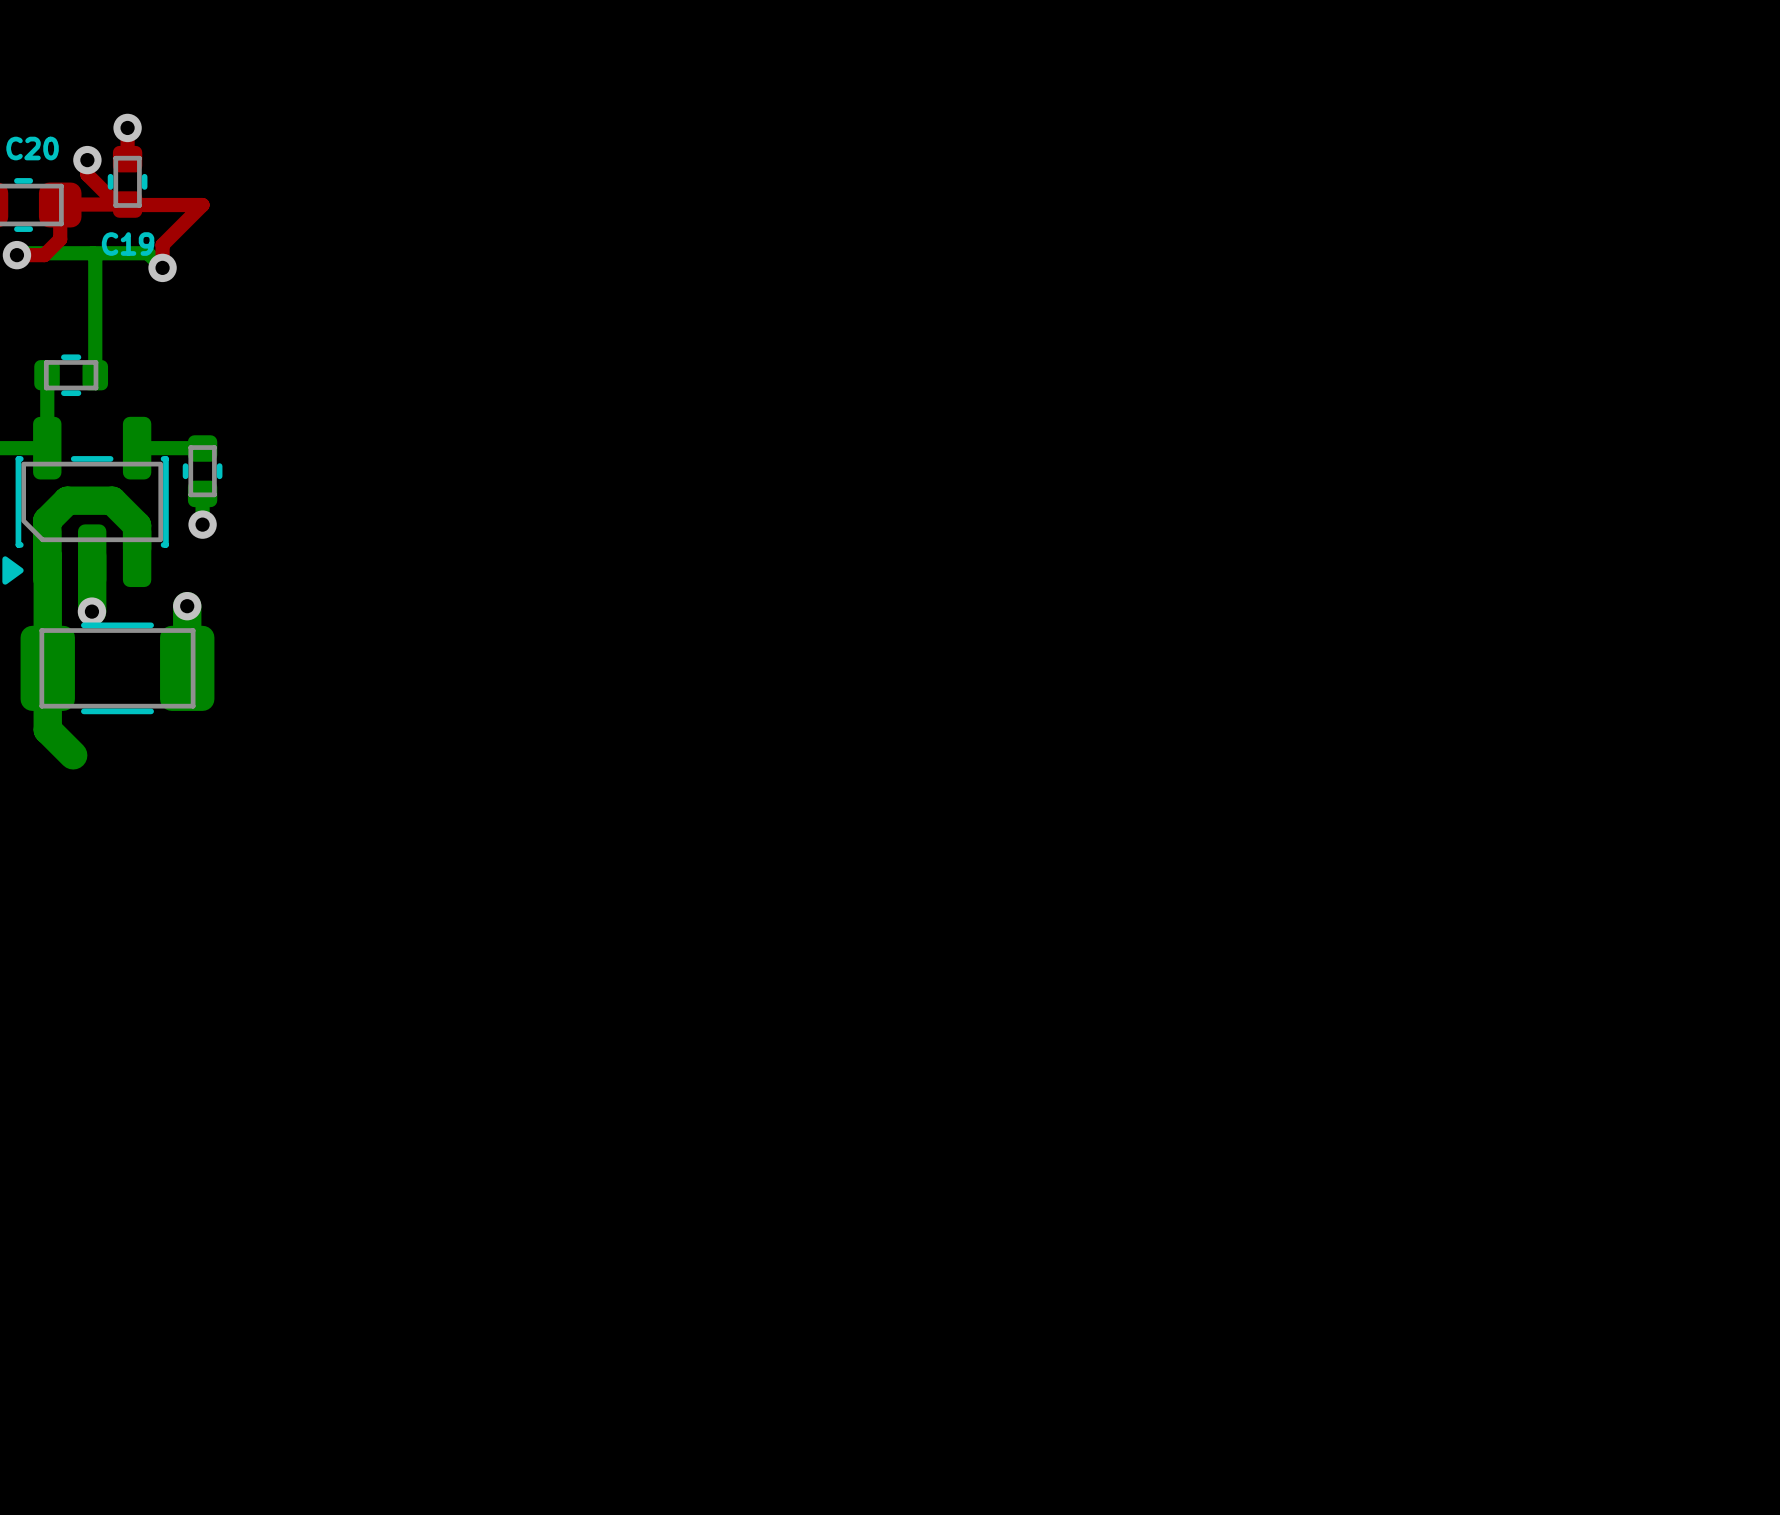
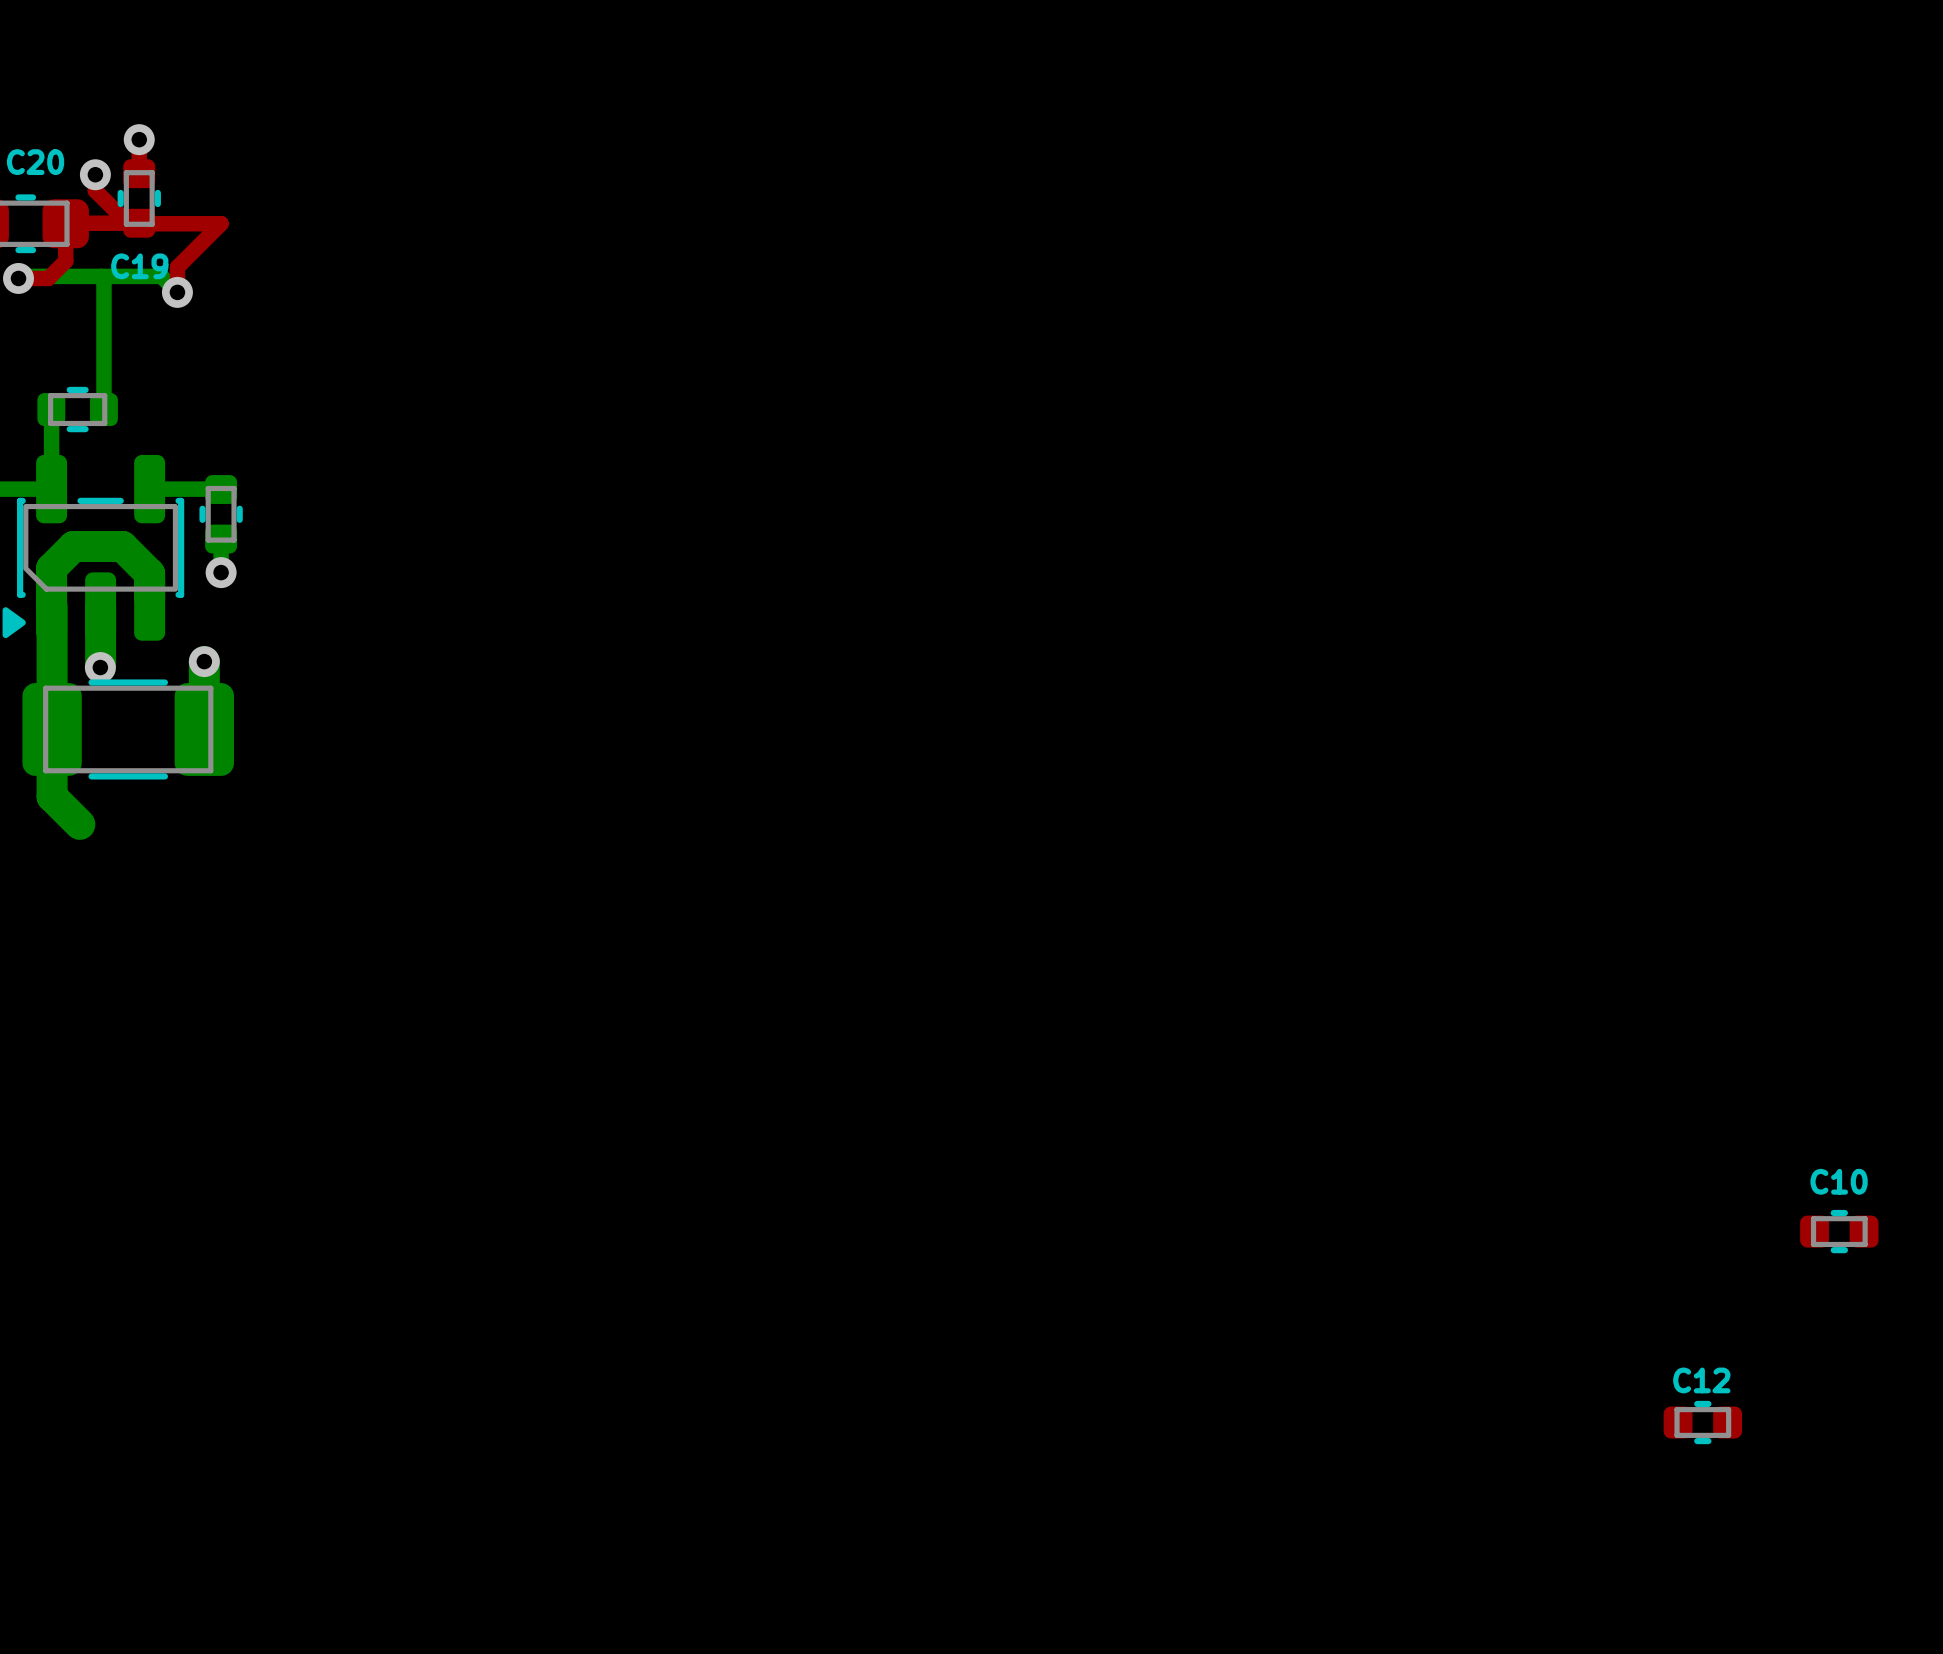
C10: none -> (1839, 1231)
C12: none -> (1702, 1422)

